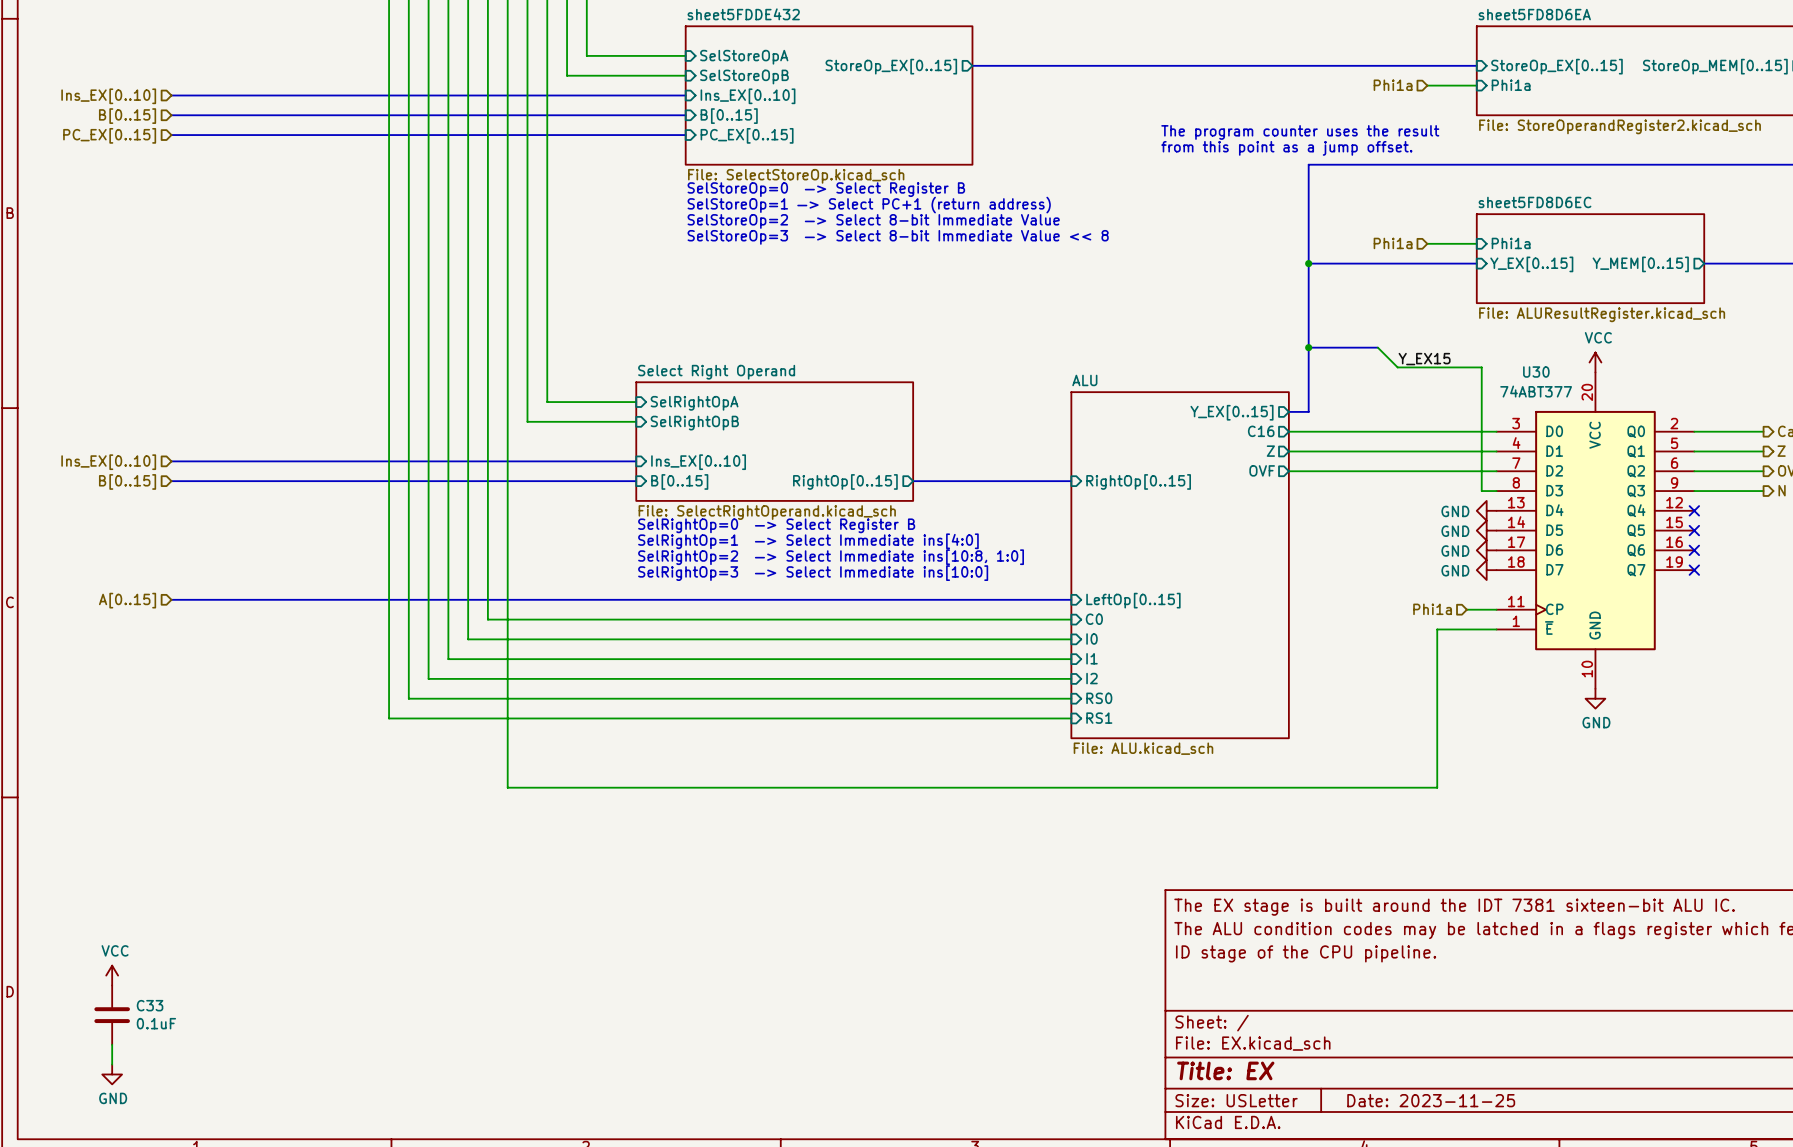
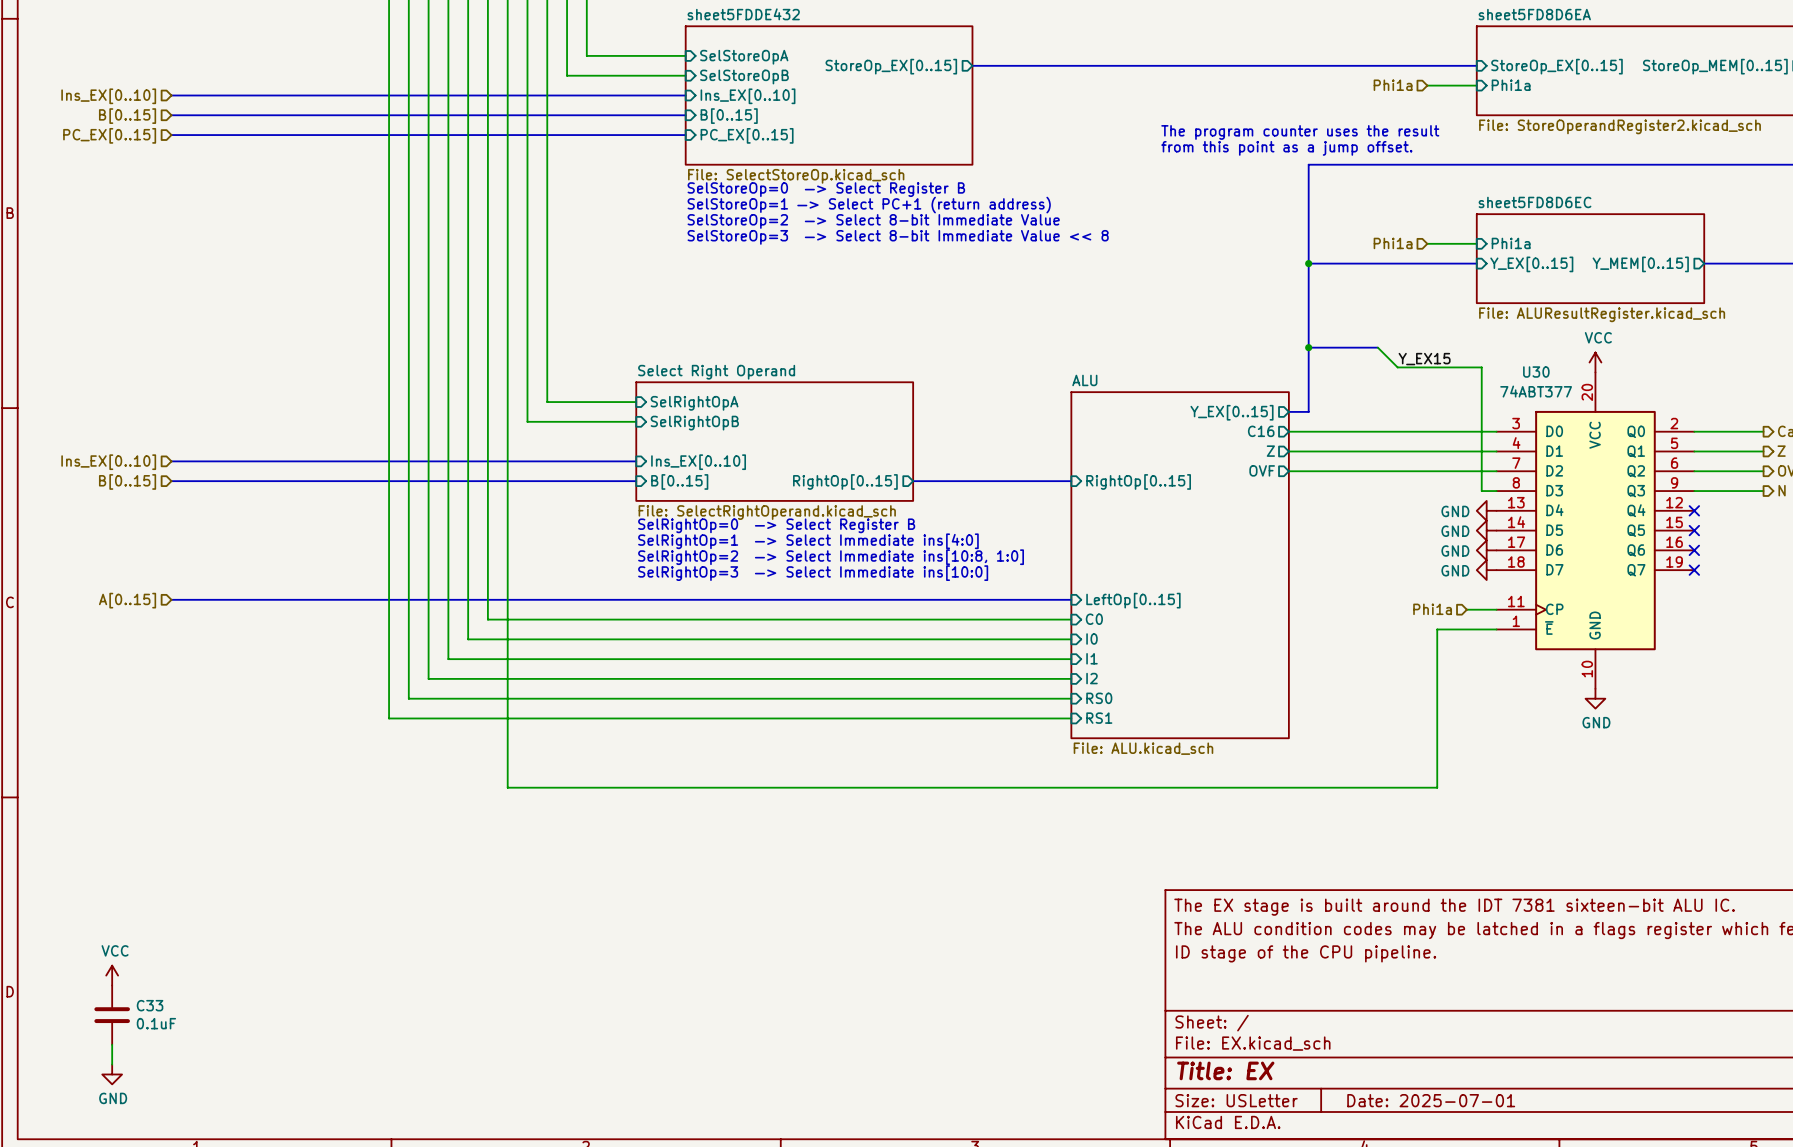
title block: Date: 2023-11-25 (1431, 1100) -> Date: 2025-07-01 (1431, 1100)

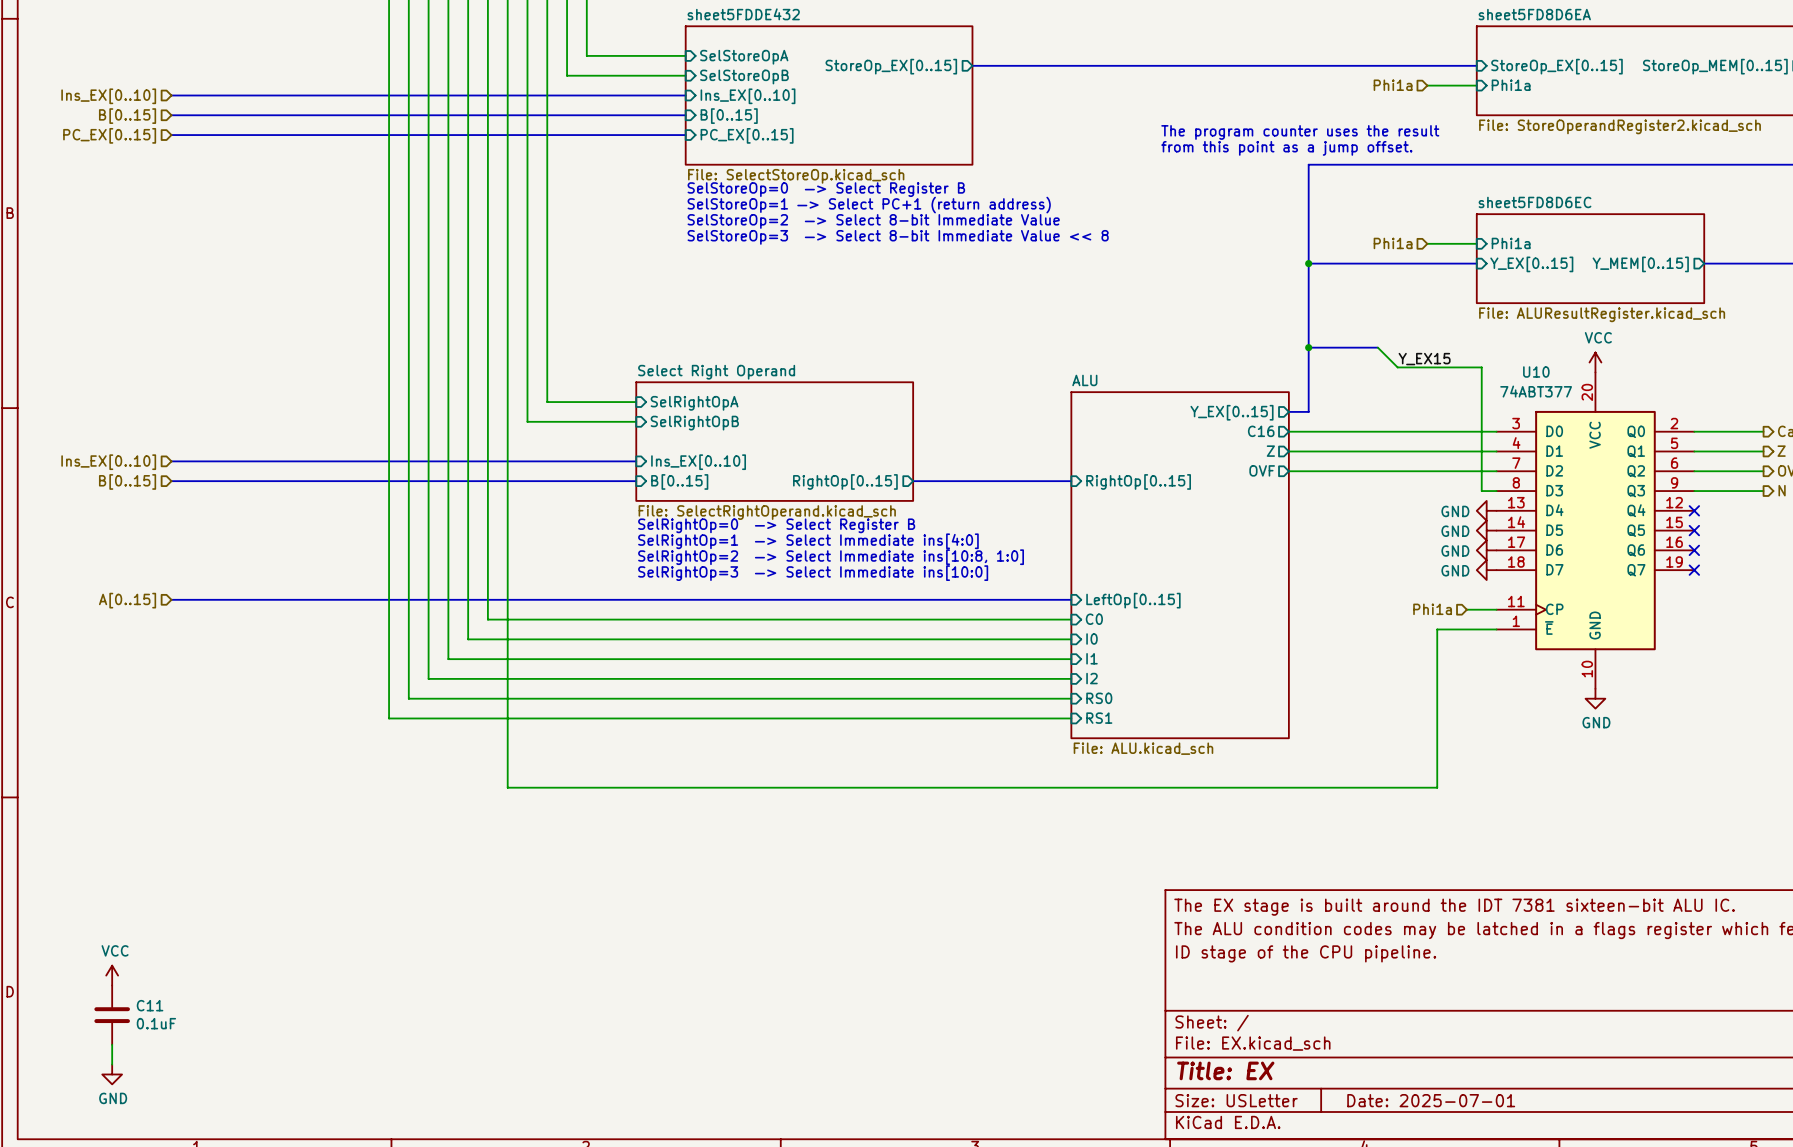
U30 name: U30 (1536, 372) -> U10 (1536, 372)
C33 name: C33 (150, 1005) -> C11 (150, 1005)

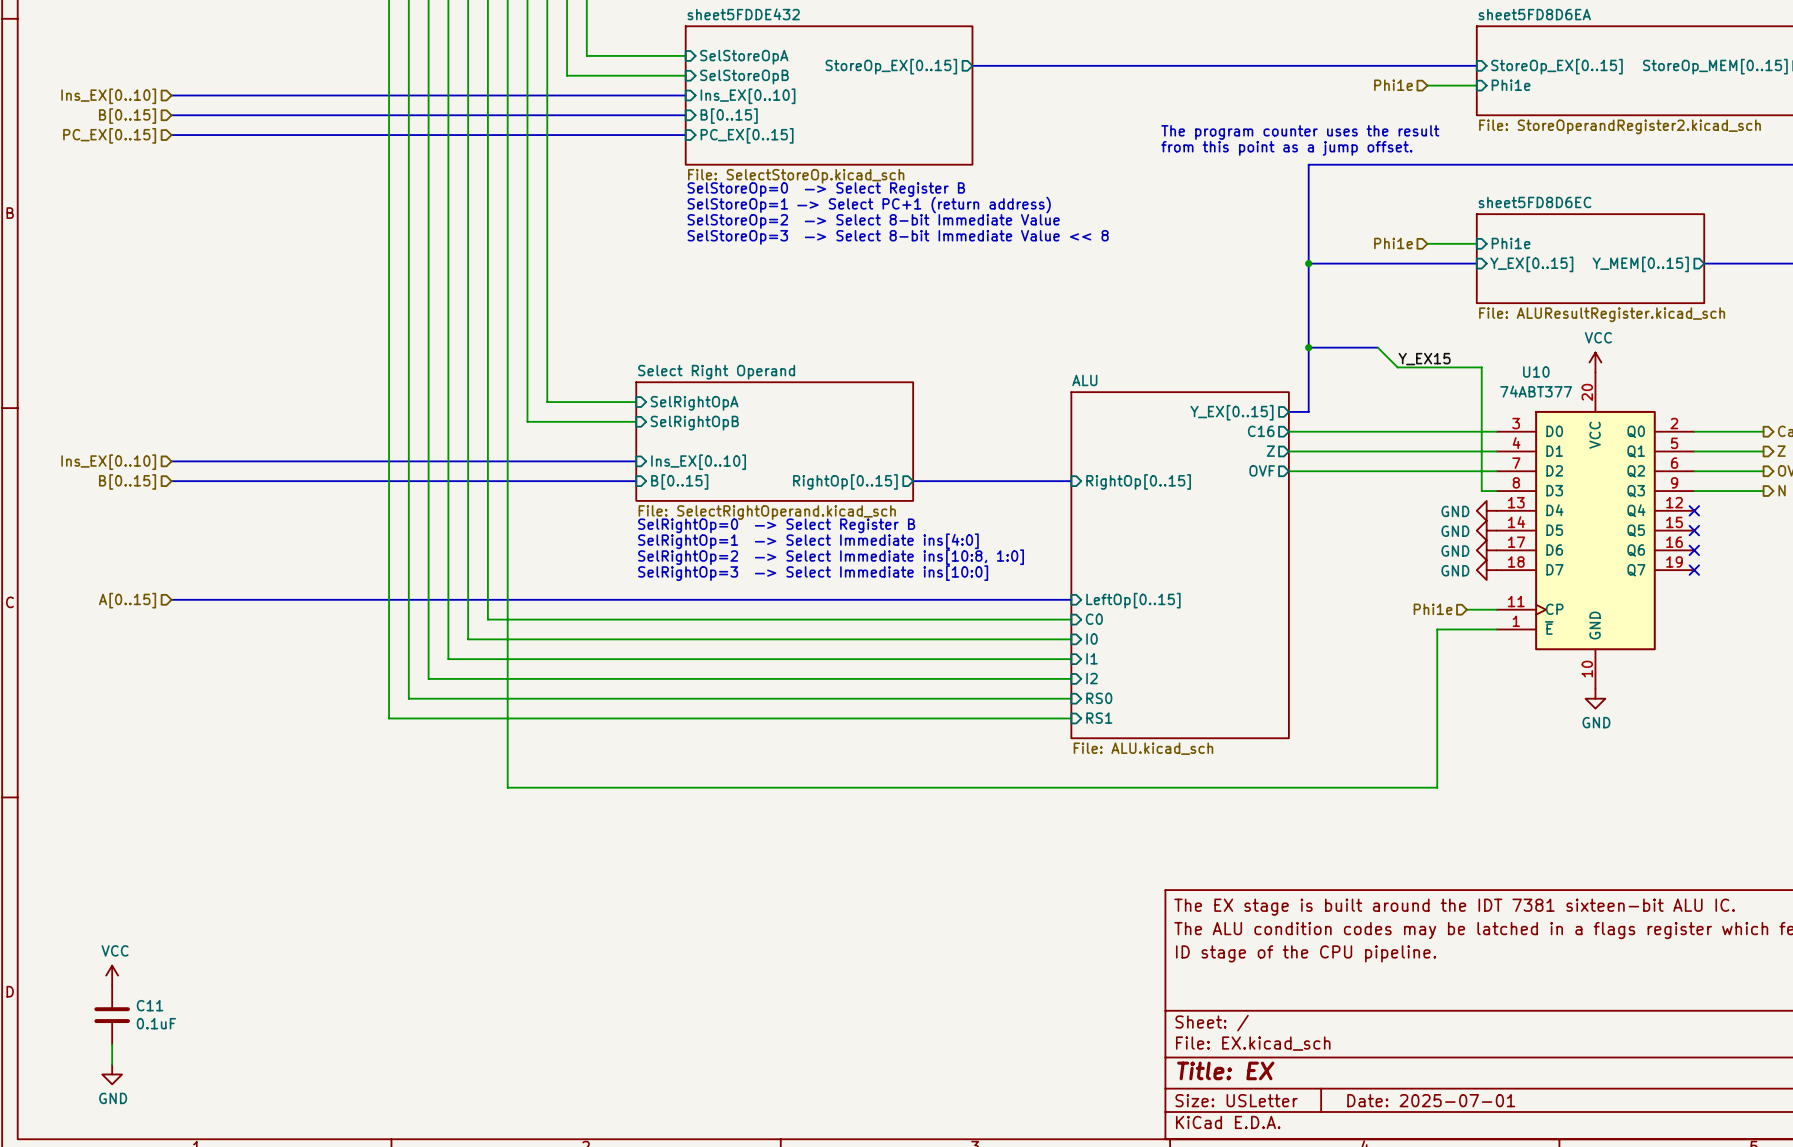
hierarchical label: Phi1a (1393, 85) -> Phi1e (1393, 85)
sheet pin: Phi1a (1511, 85) -> Phi1e (1511, 85)
hierarchical label: Phi1a (1393, 243) -> Phi1e (1393, 243)
sheet pin: Phi1a (1511, 243) -> Phi1e (1511, 243)
hierarchical label: Phi1a (1432, 609) -> Phi1e (1433, 609)

